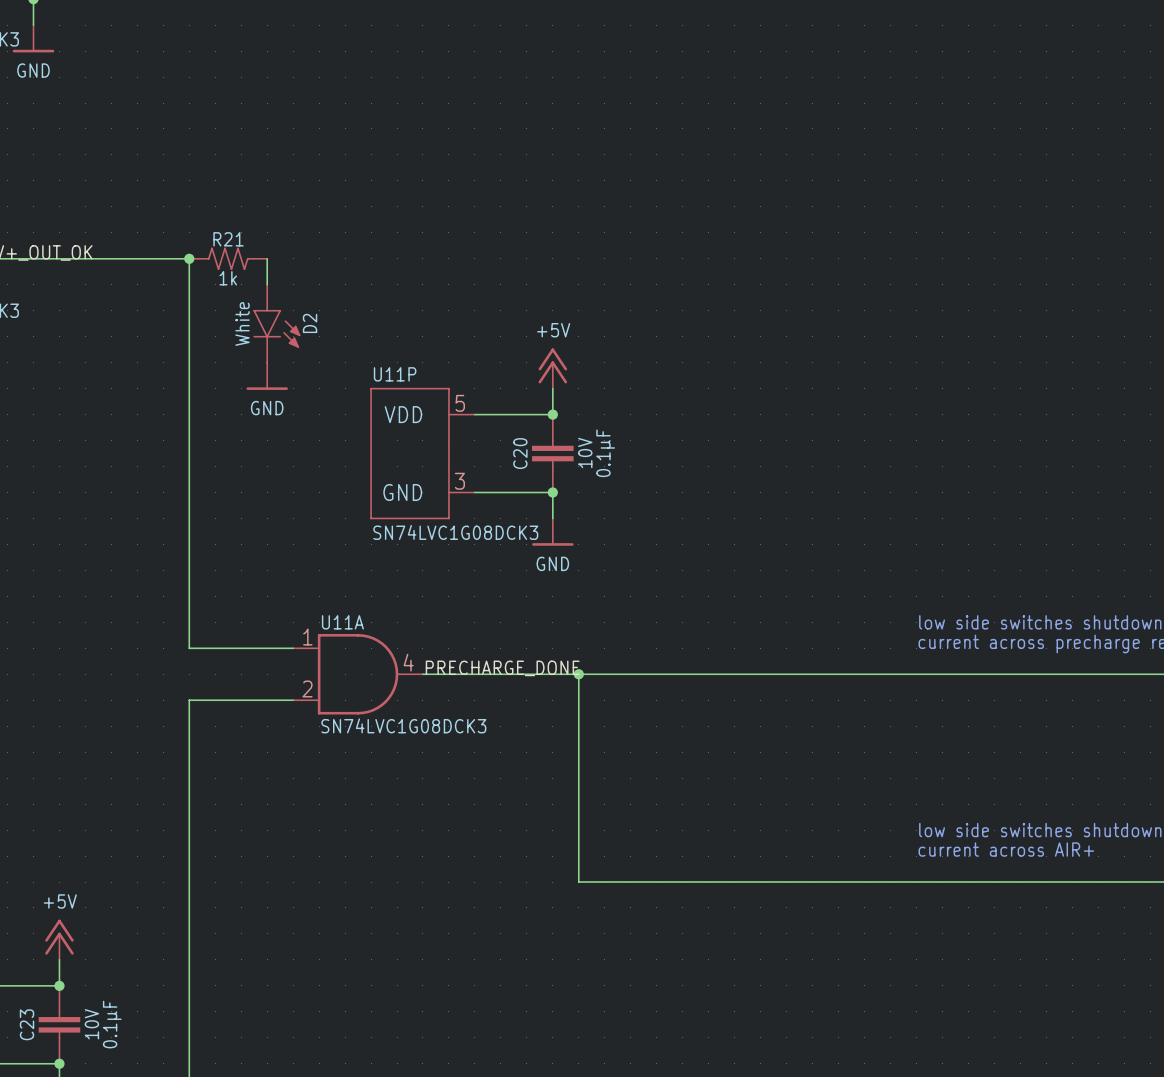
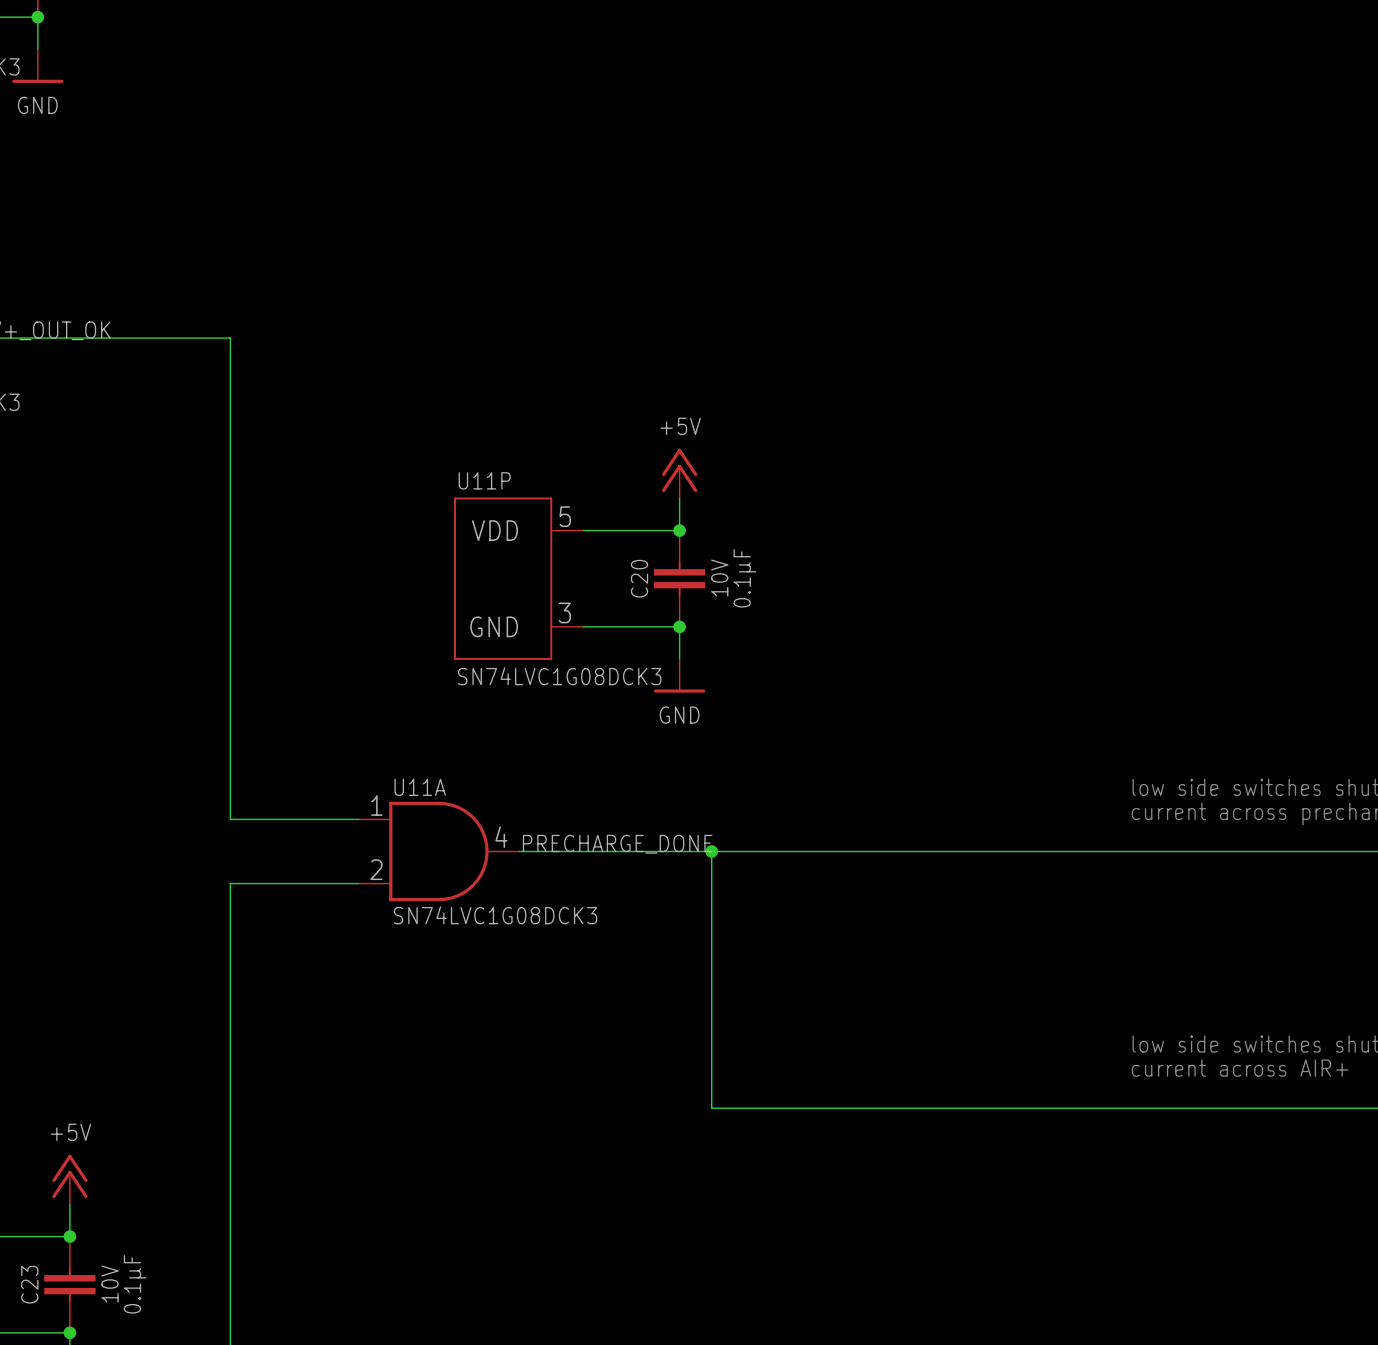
junction: (189, 258) -> none
R21: (228, 258) -> none
wire: (267, 258) (267, 284) -> none
D2: (276, 323) -> none
power symbol: GND (267, 376) -> none

